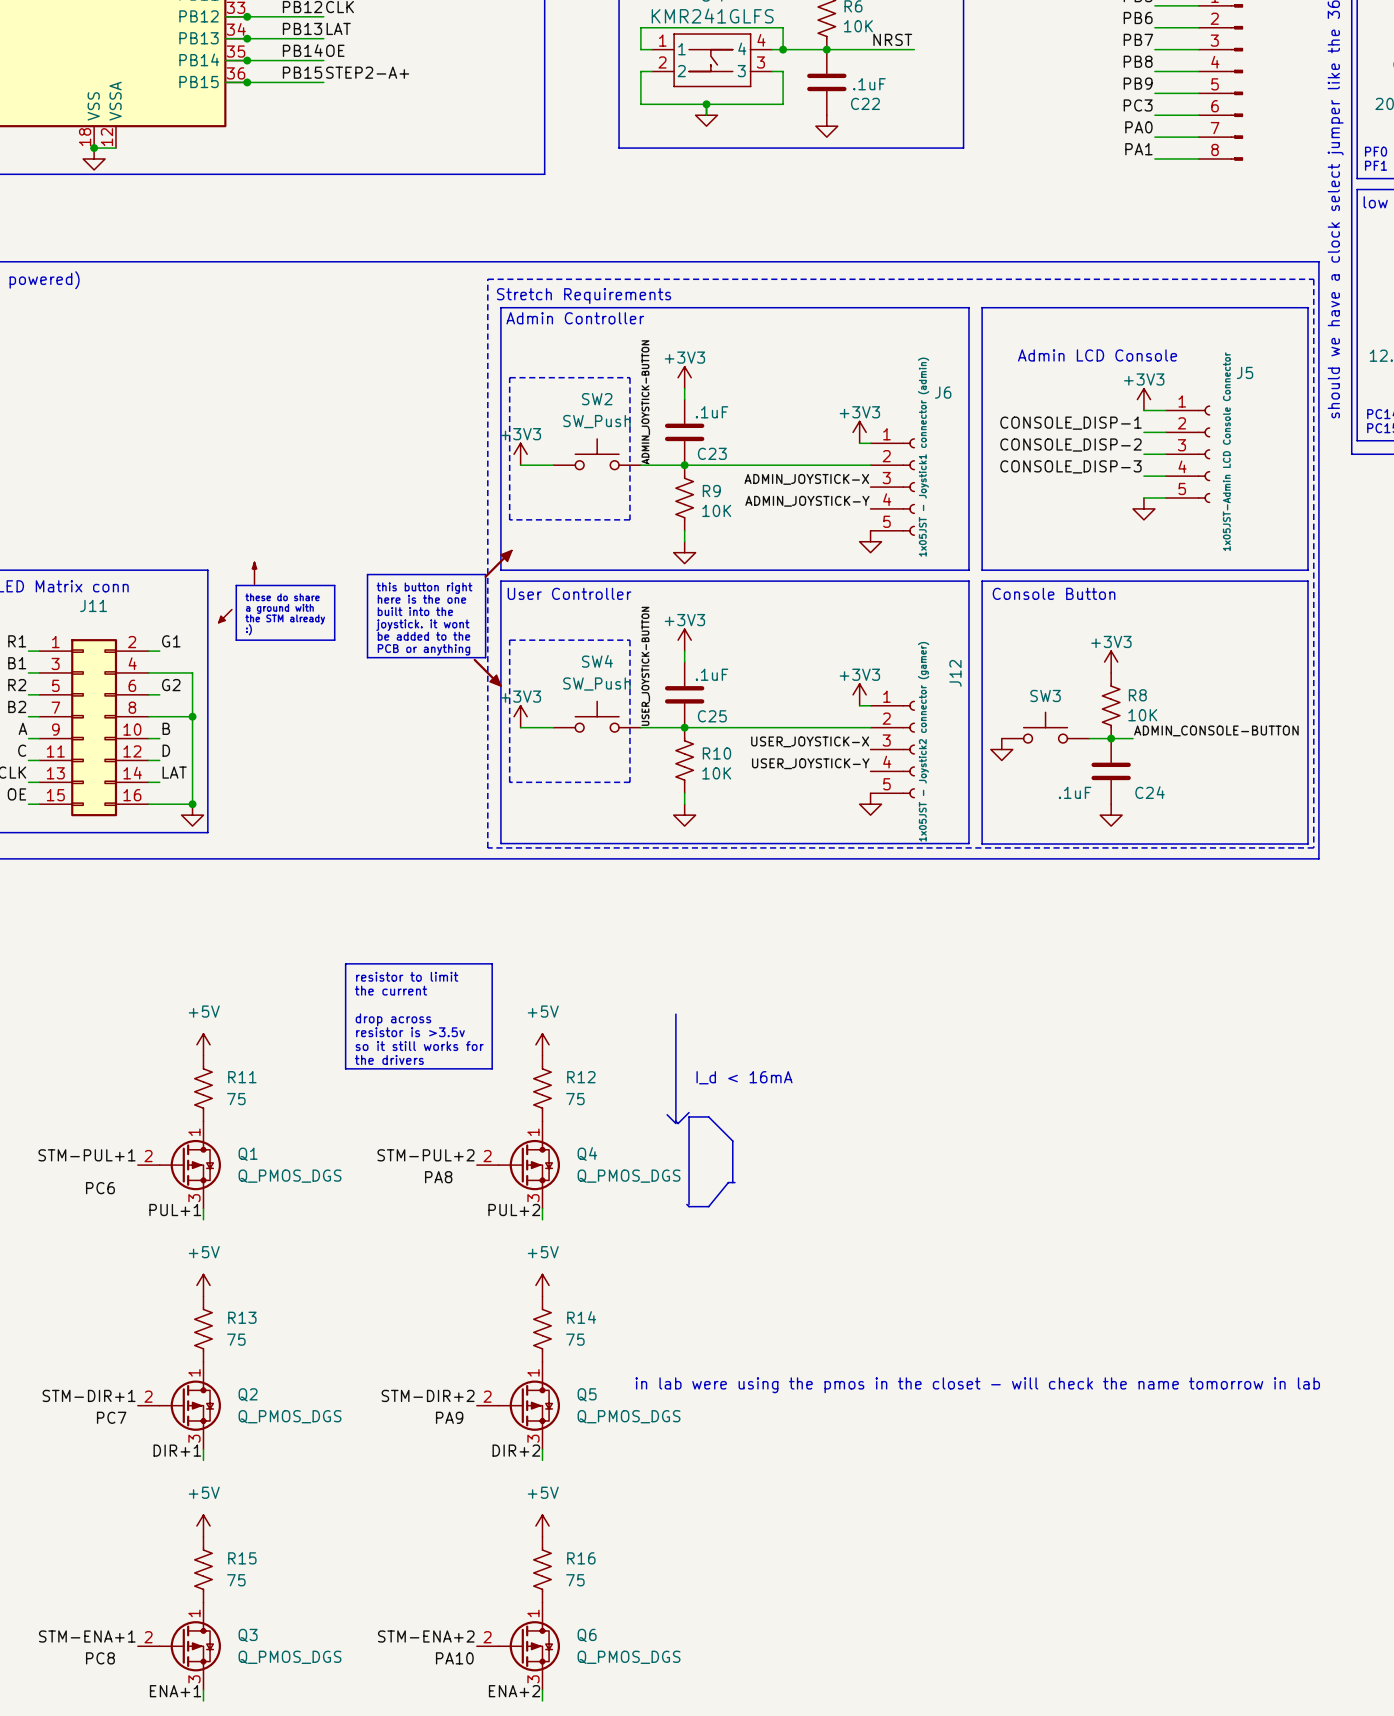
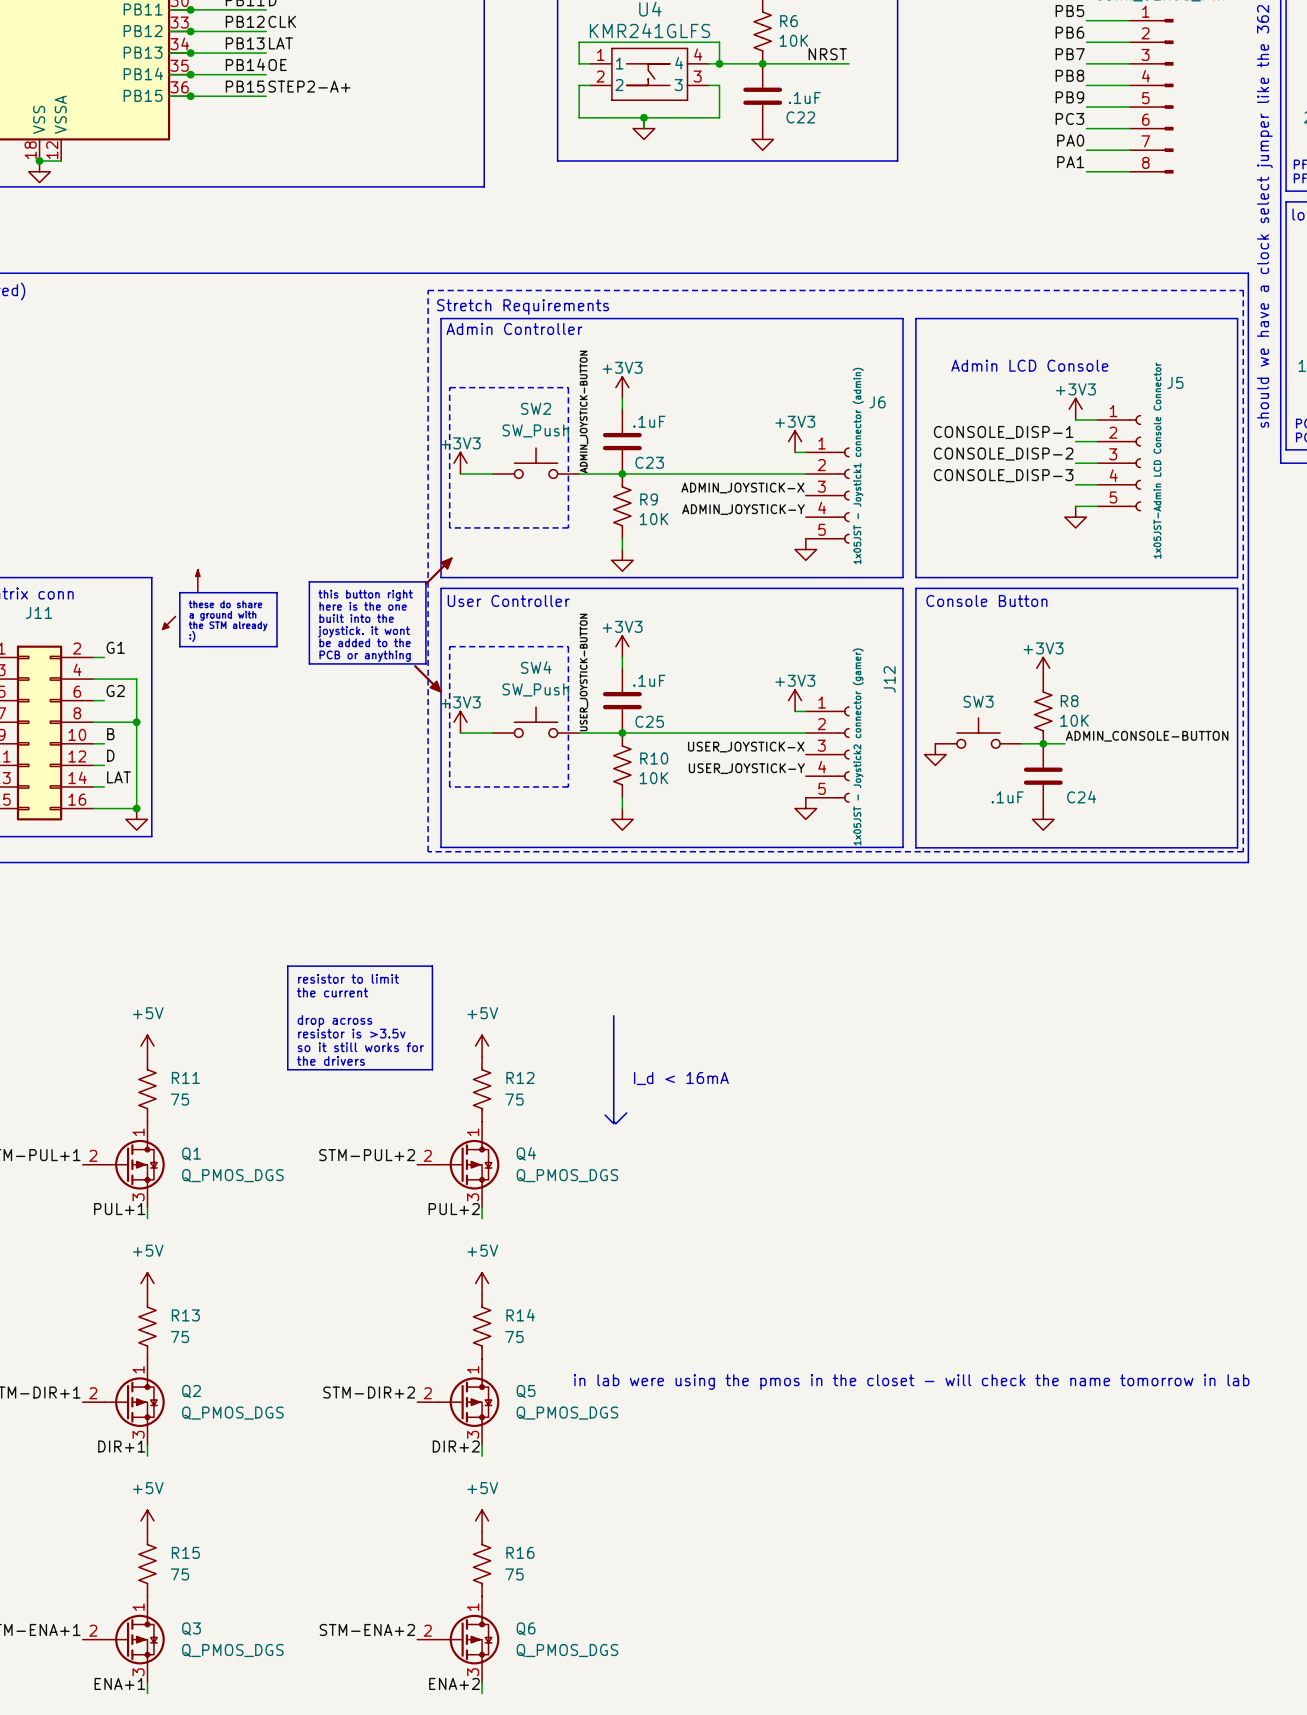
label: PA8 (438, 1177) -> none
line: (732, 1182) (732, 1141) (708, 1116) (689, 1116) (689, 1204) -> none
line: (734, 1182) (728, 1182) (708, 1206) (689, 1206) (686, 1204) -> none
label: PC6 (100, 1188) -> none
label: PC7 (111, 1417) -> none
label: PA9 (449, 1417) -> none
label: PC8 (100, 1658) -> none
label: PA10 (454, 1658) -> none

